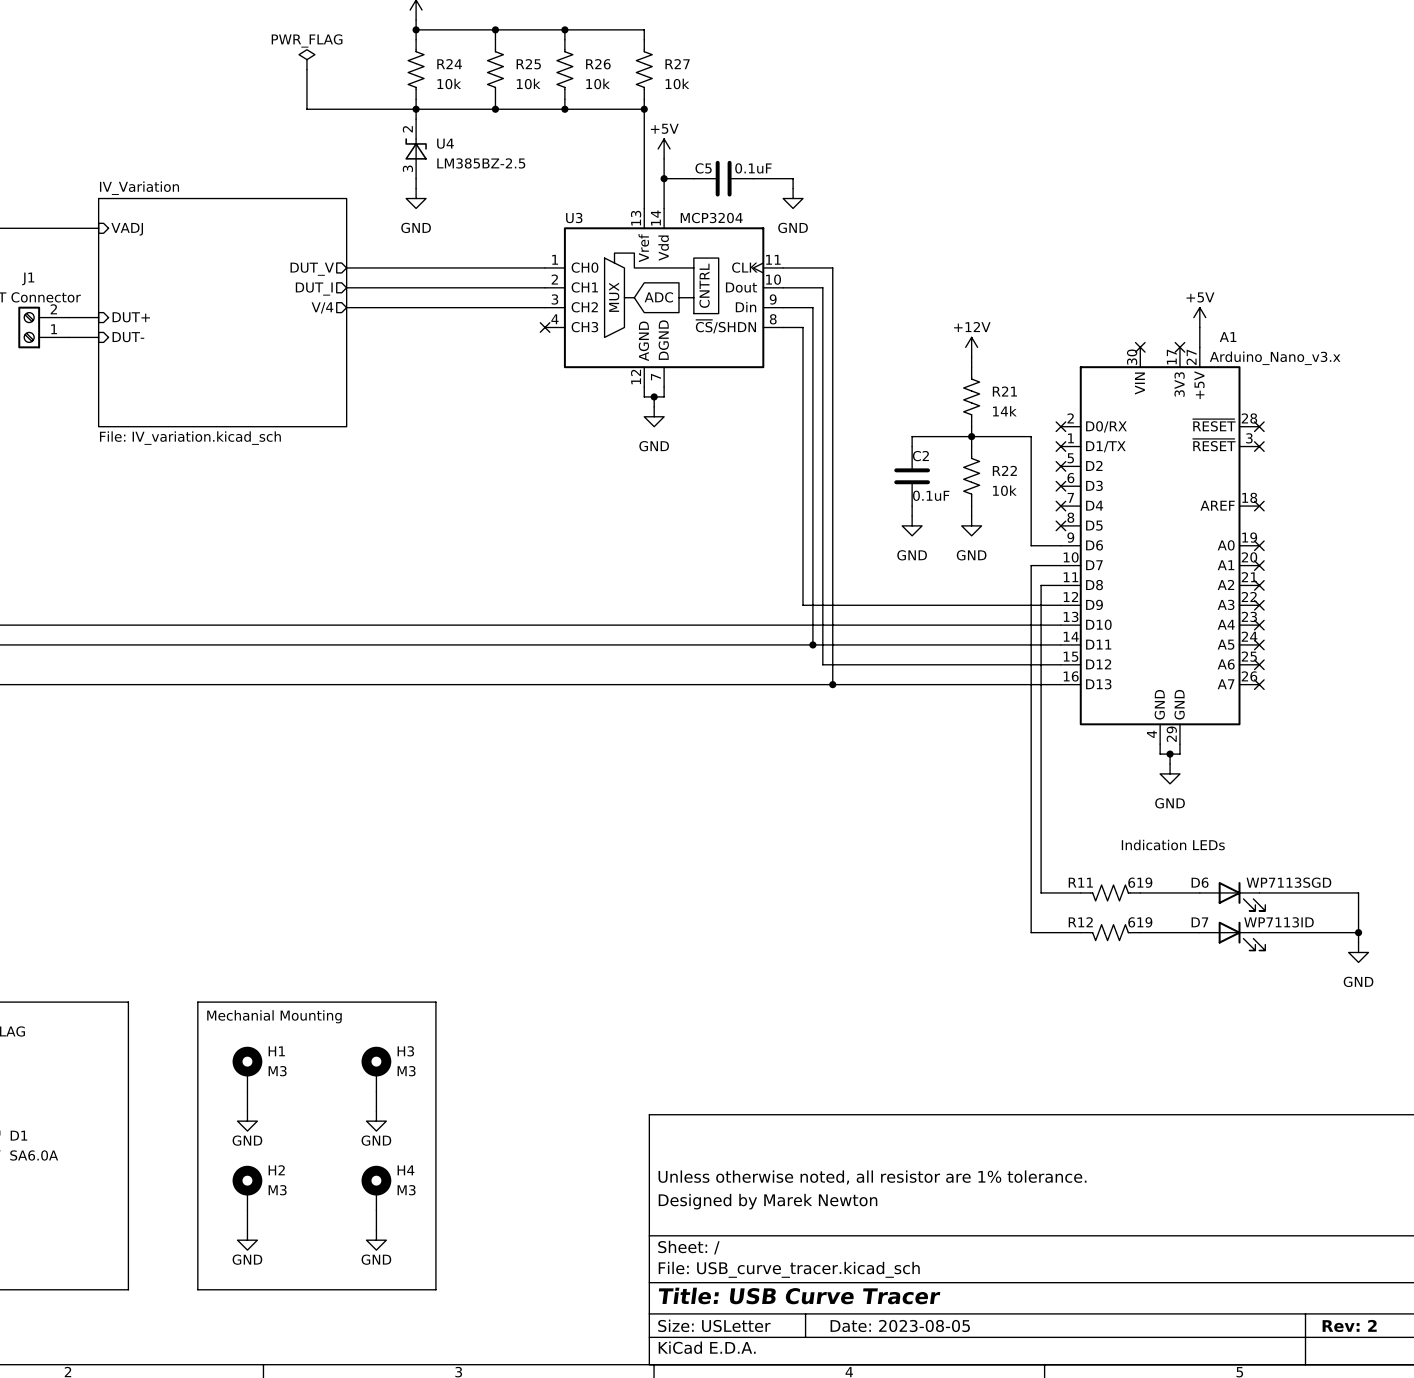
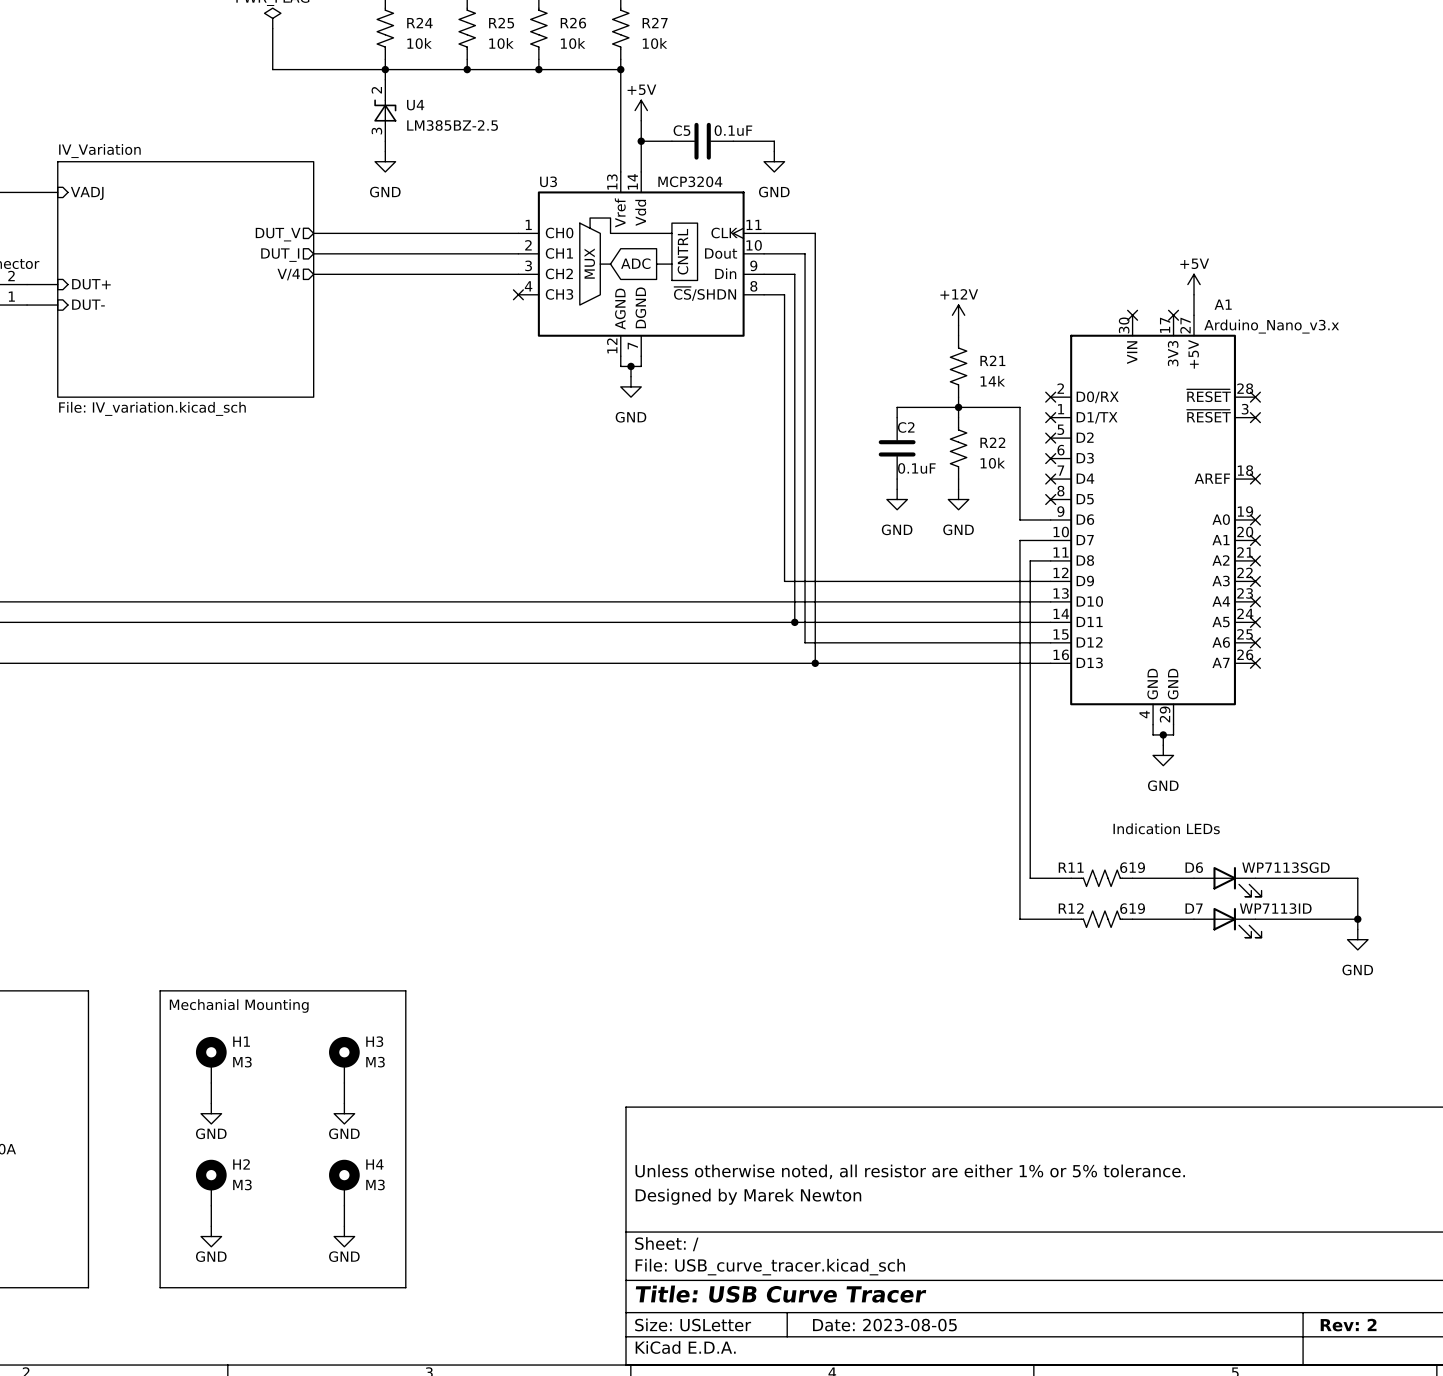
title block: Unless otherwise noted, all resistor are 1% tolerance. (872, 1177) -> Unless otherwise noted, all resistor are either 1% or 5% tolerance. (910, 1171)

